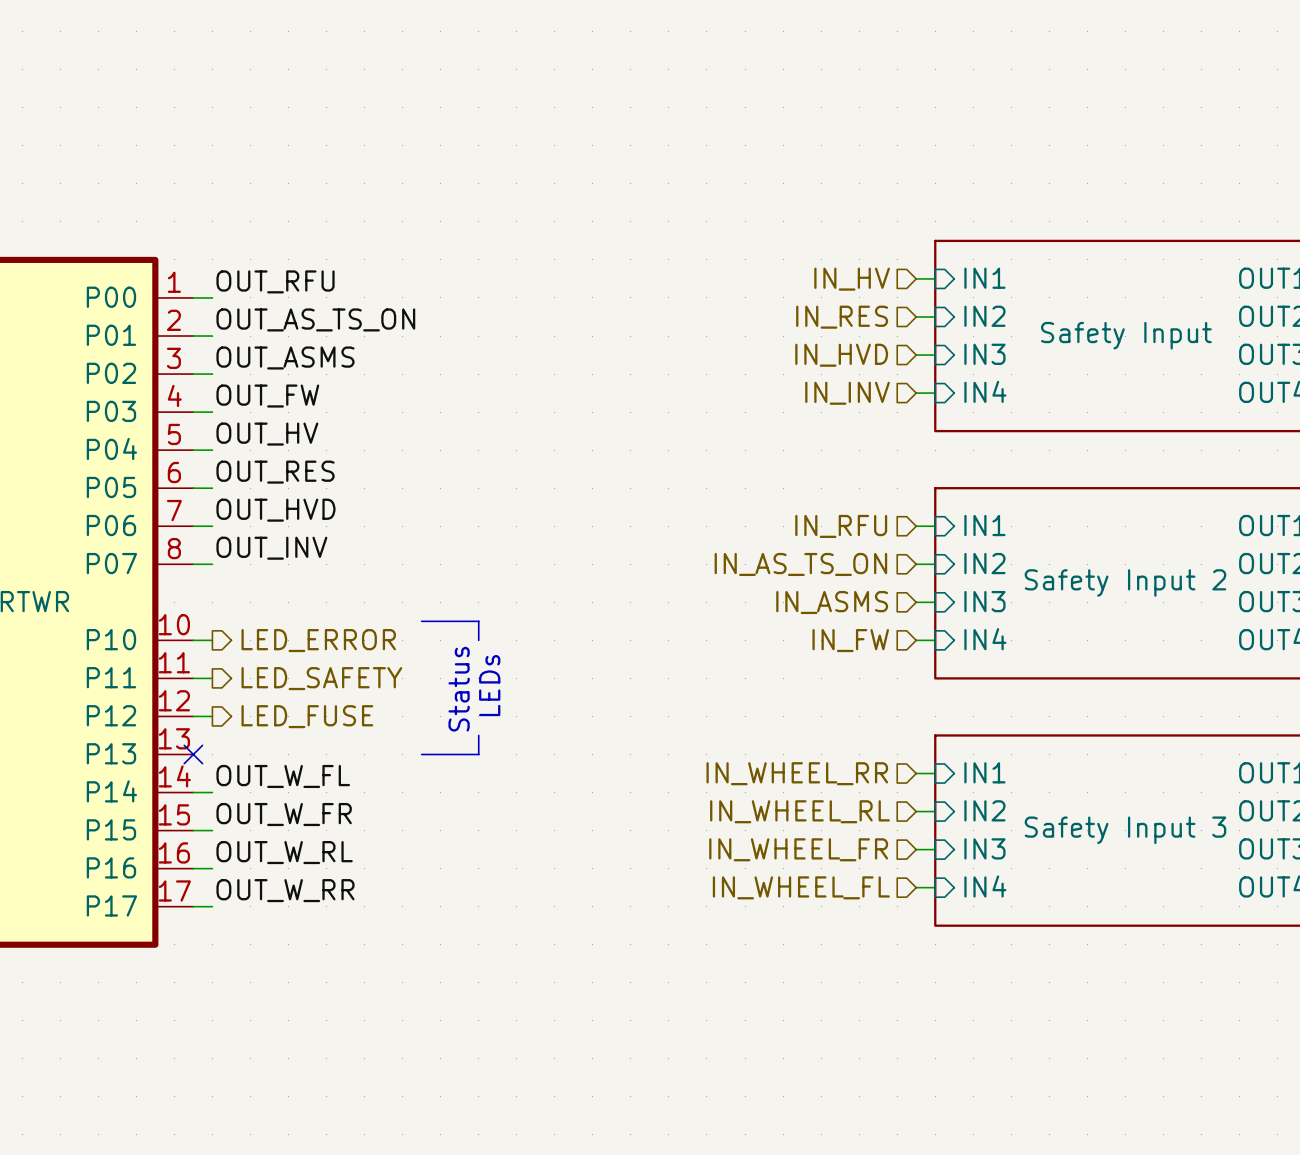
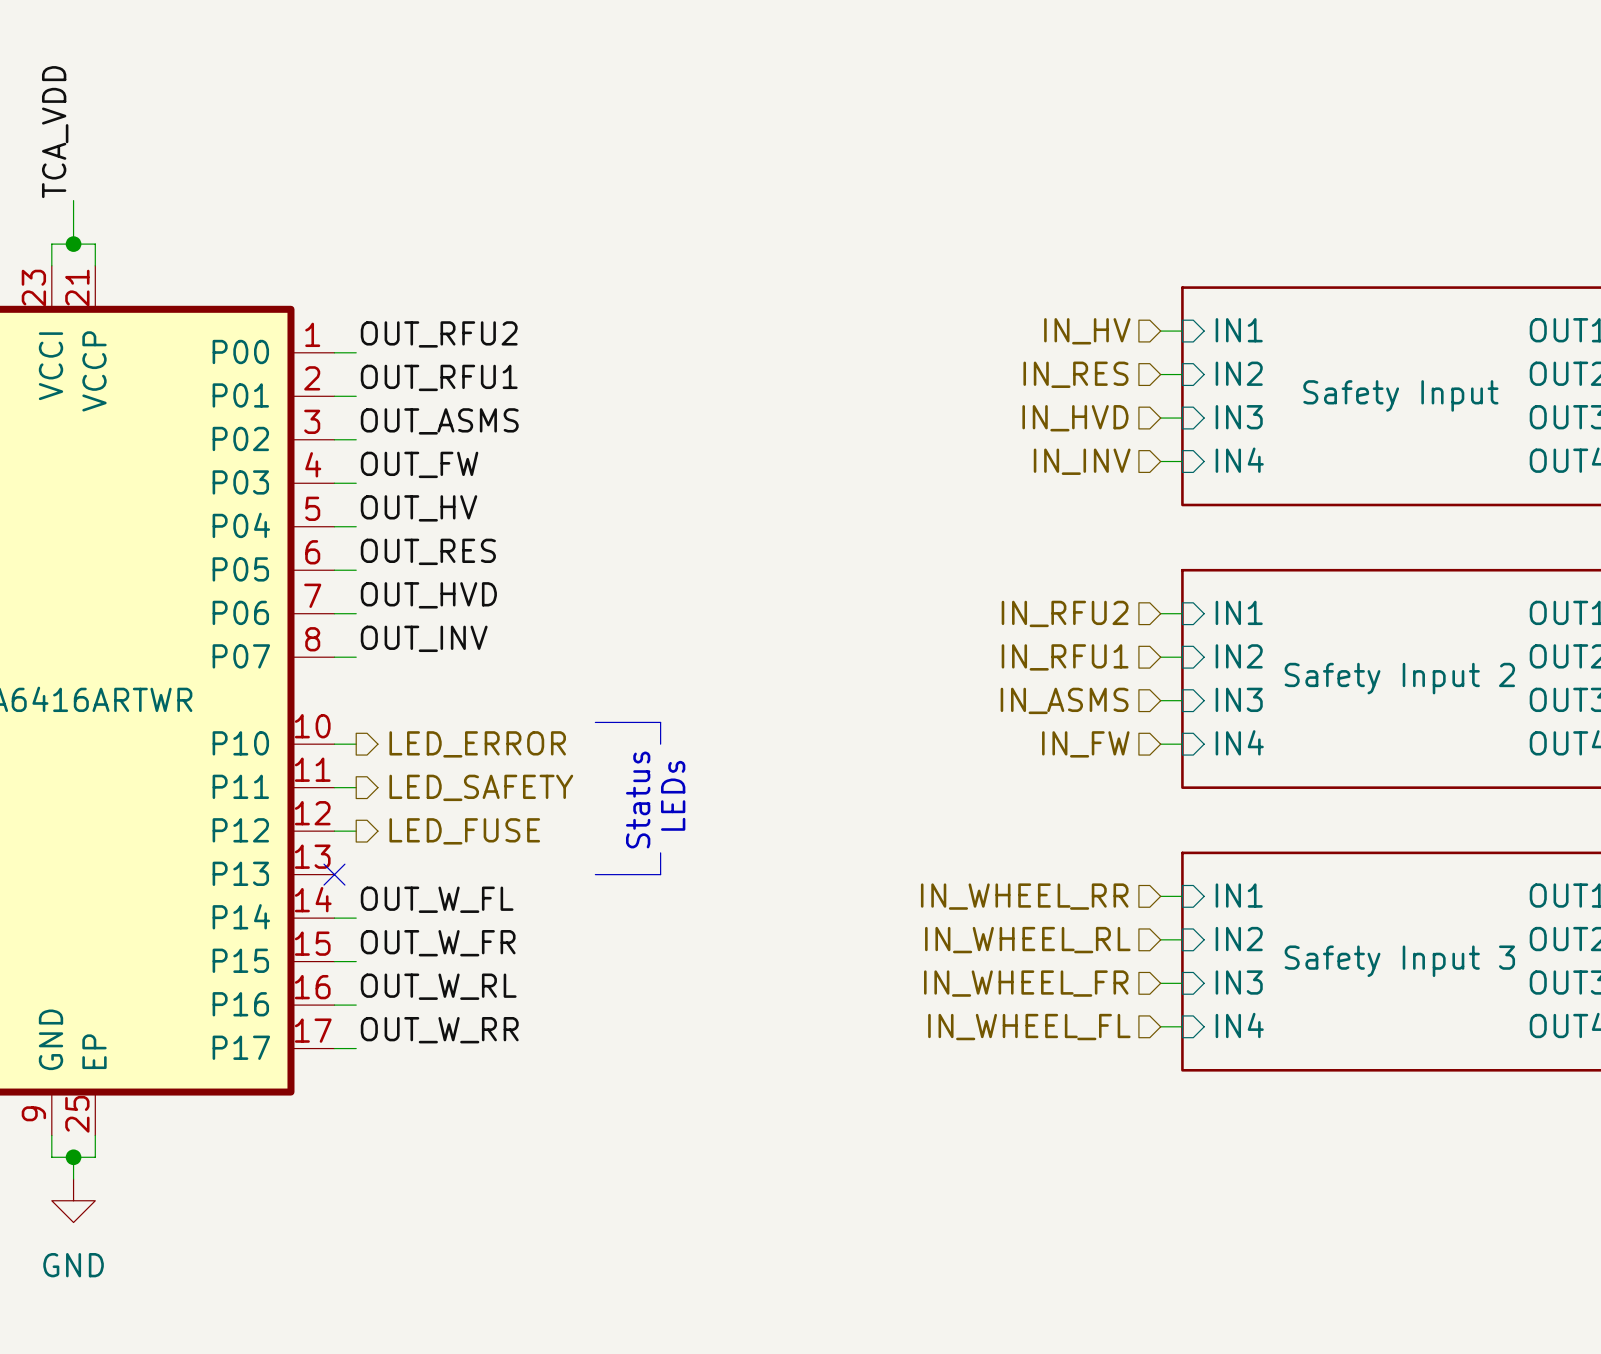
label: OUT_RFU (275, 281) -> OUT_RFU2 (439, 334)
label: OUT_AS_TS_ON (315, 319) -> OUT_RFU1 (439, 377)
hierarchical label: IN_RFU (841, 526) -> IN_RFU2 (1065, 613)
hierarchical label: IN_AS_TS_ON (800, 564) -> IN_RFU1 (1065, 657)

